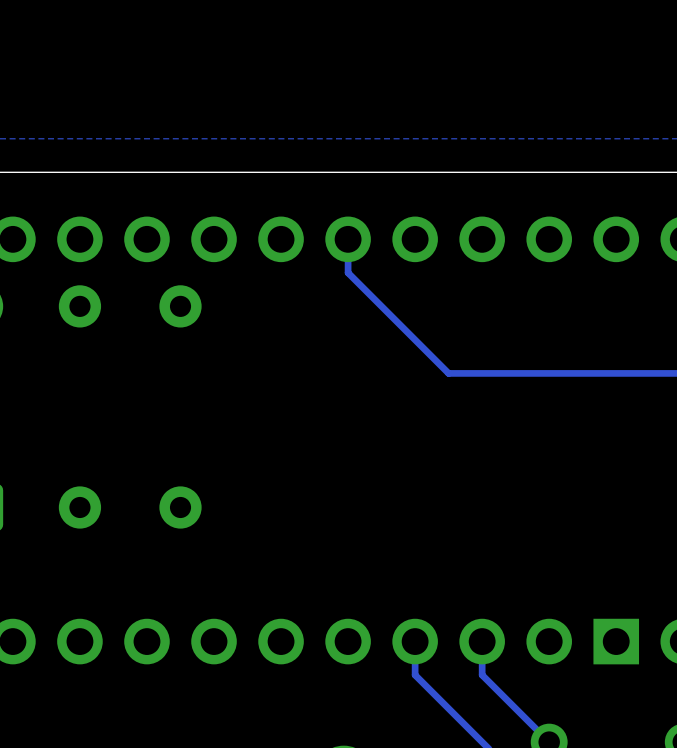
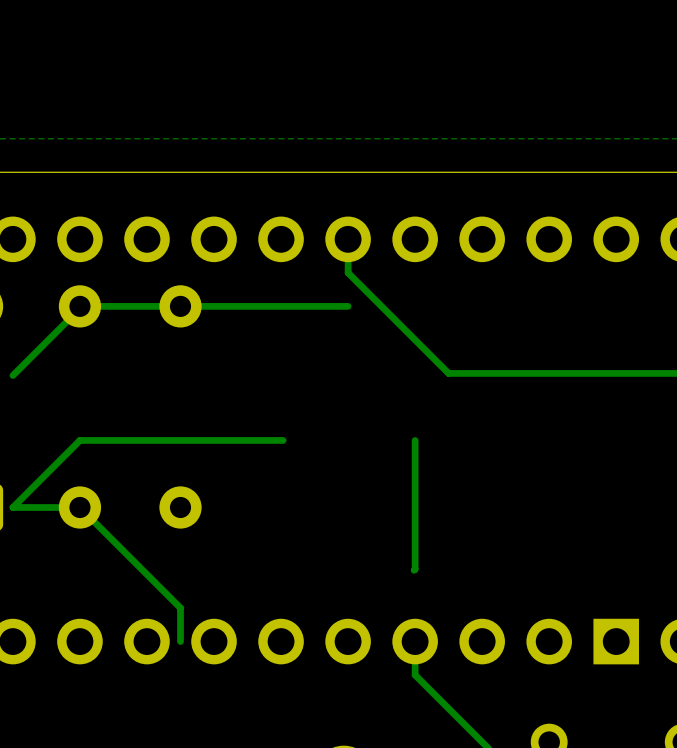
track: none -> (348, 306) (82, 306) (12, 375)
track: none -> (283, 440) (79, 440) (12, 507) (79, 507) (180, 608) (180, 641)
track: none -> (415, 440) (414, 570)
track: (482, 641) (482, 675) (549, 742) -> none

